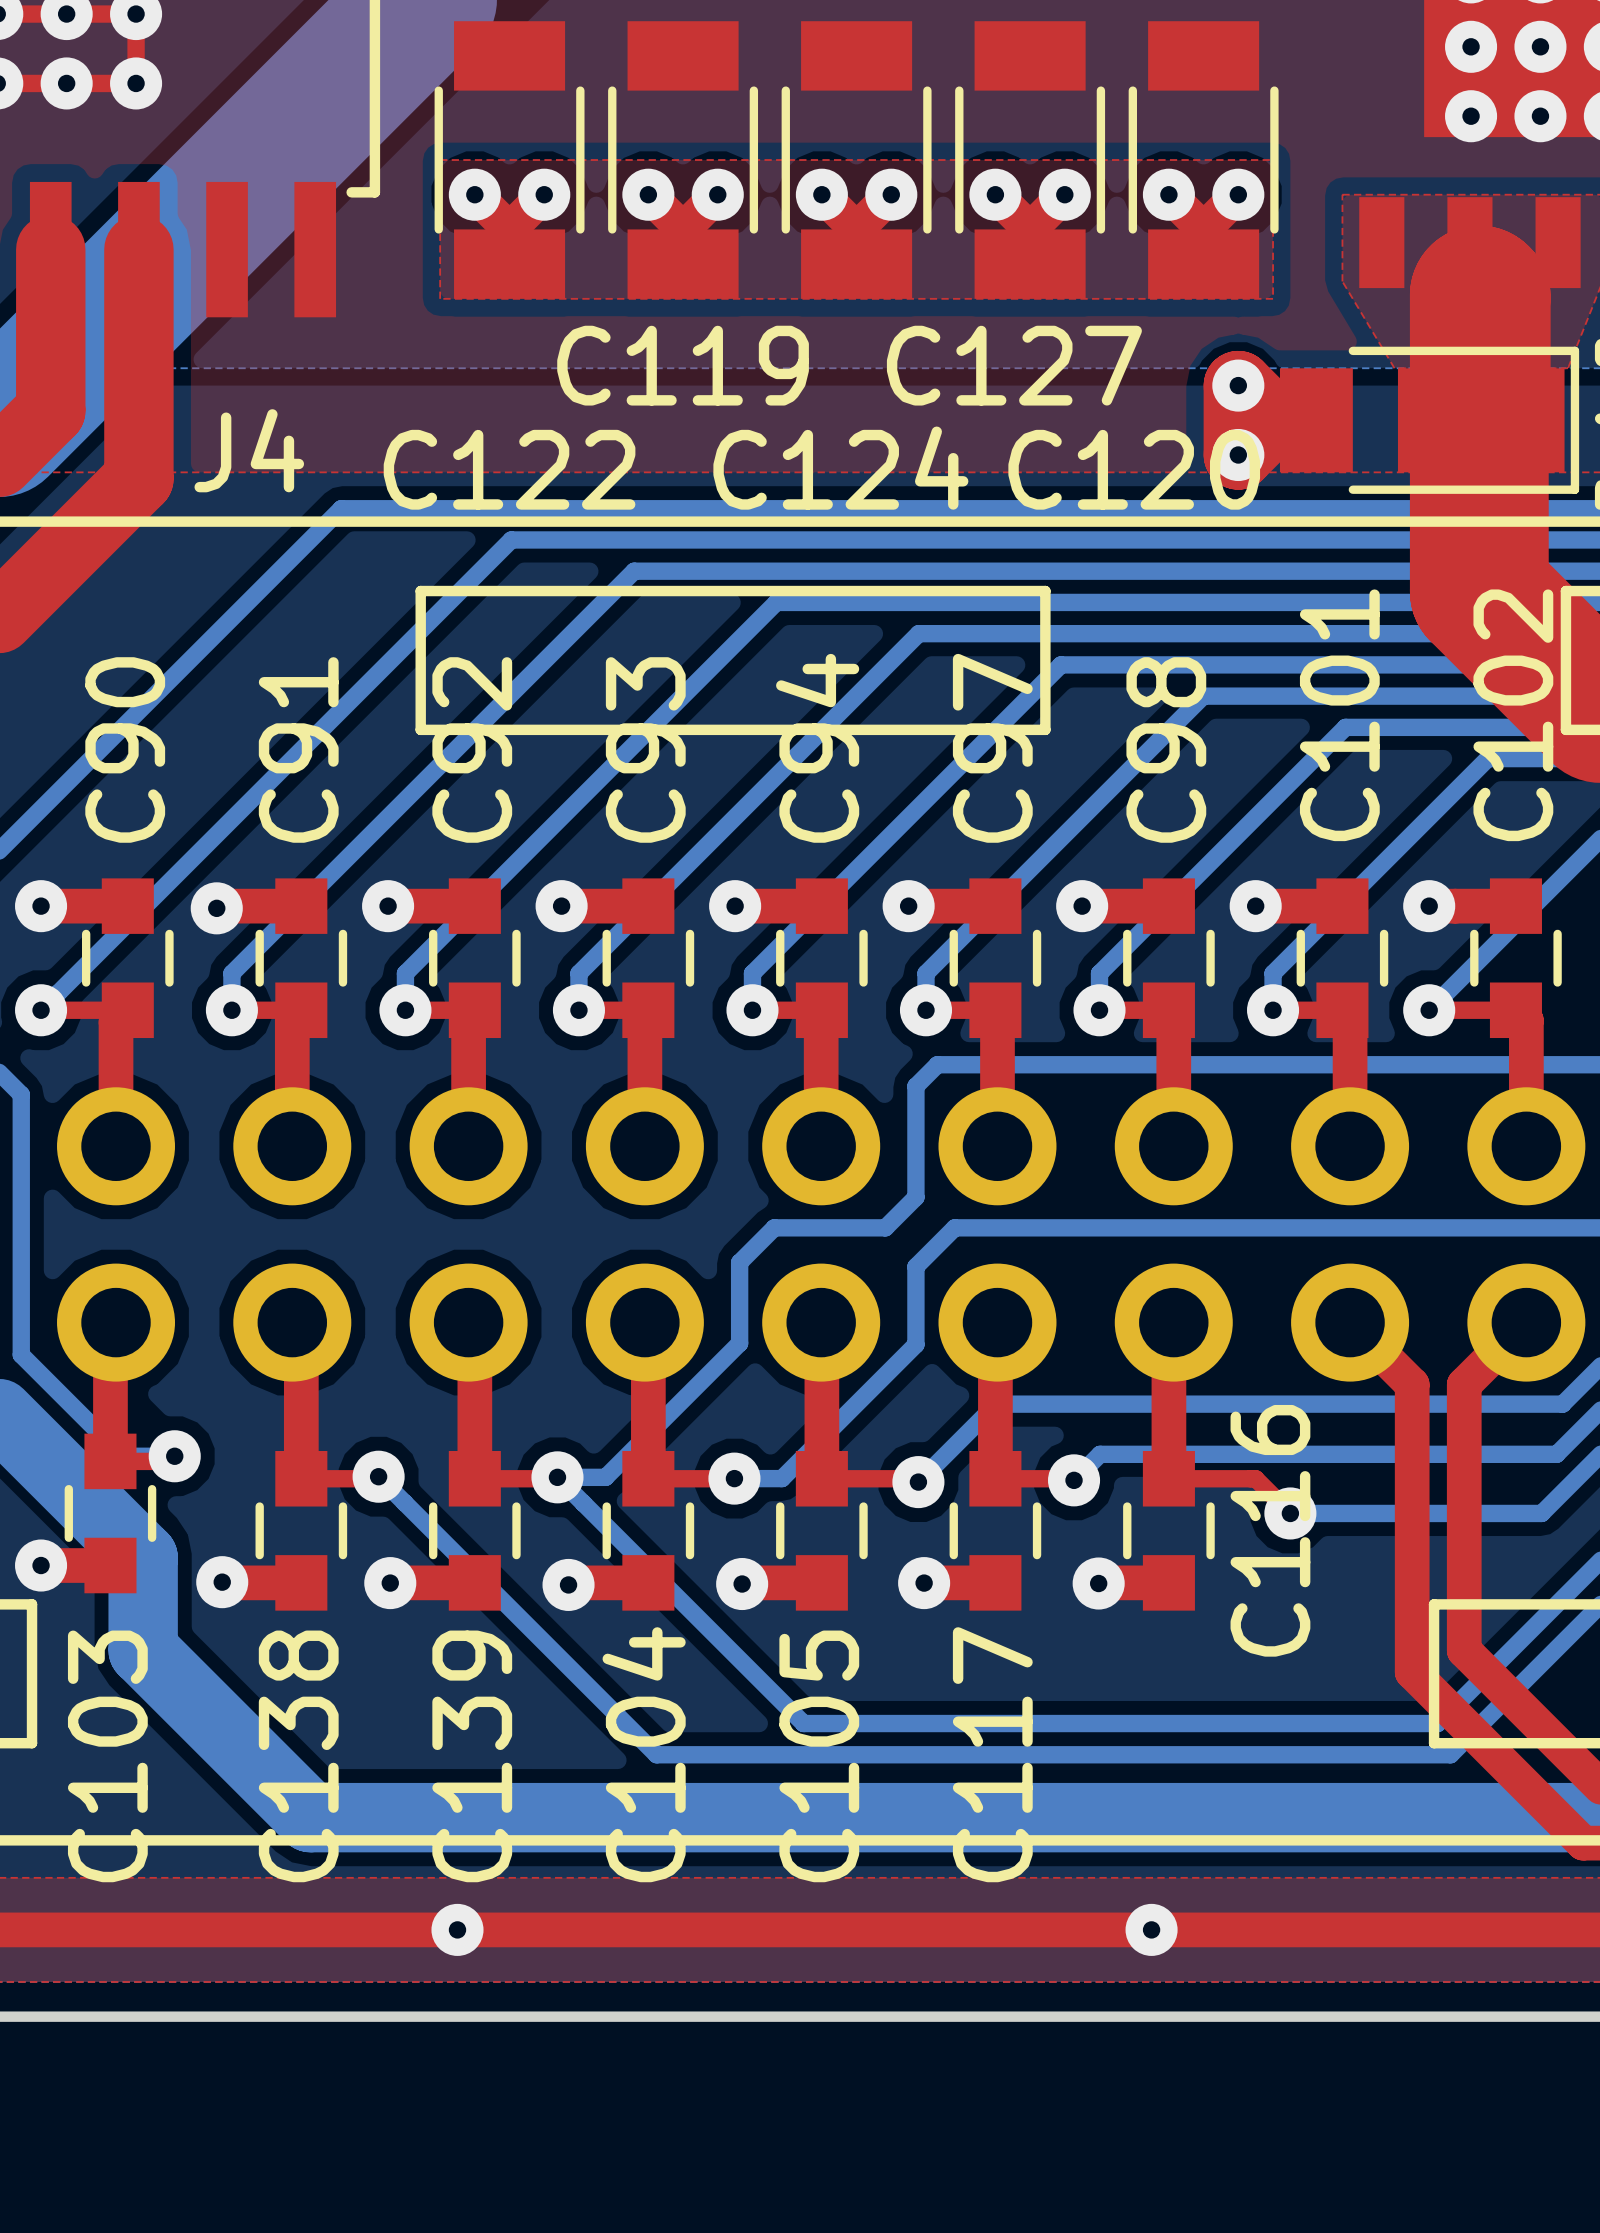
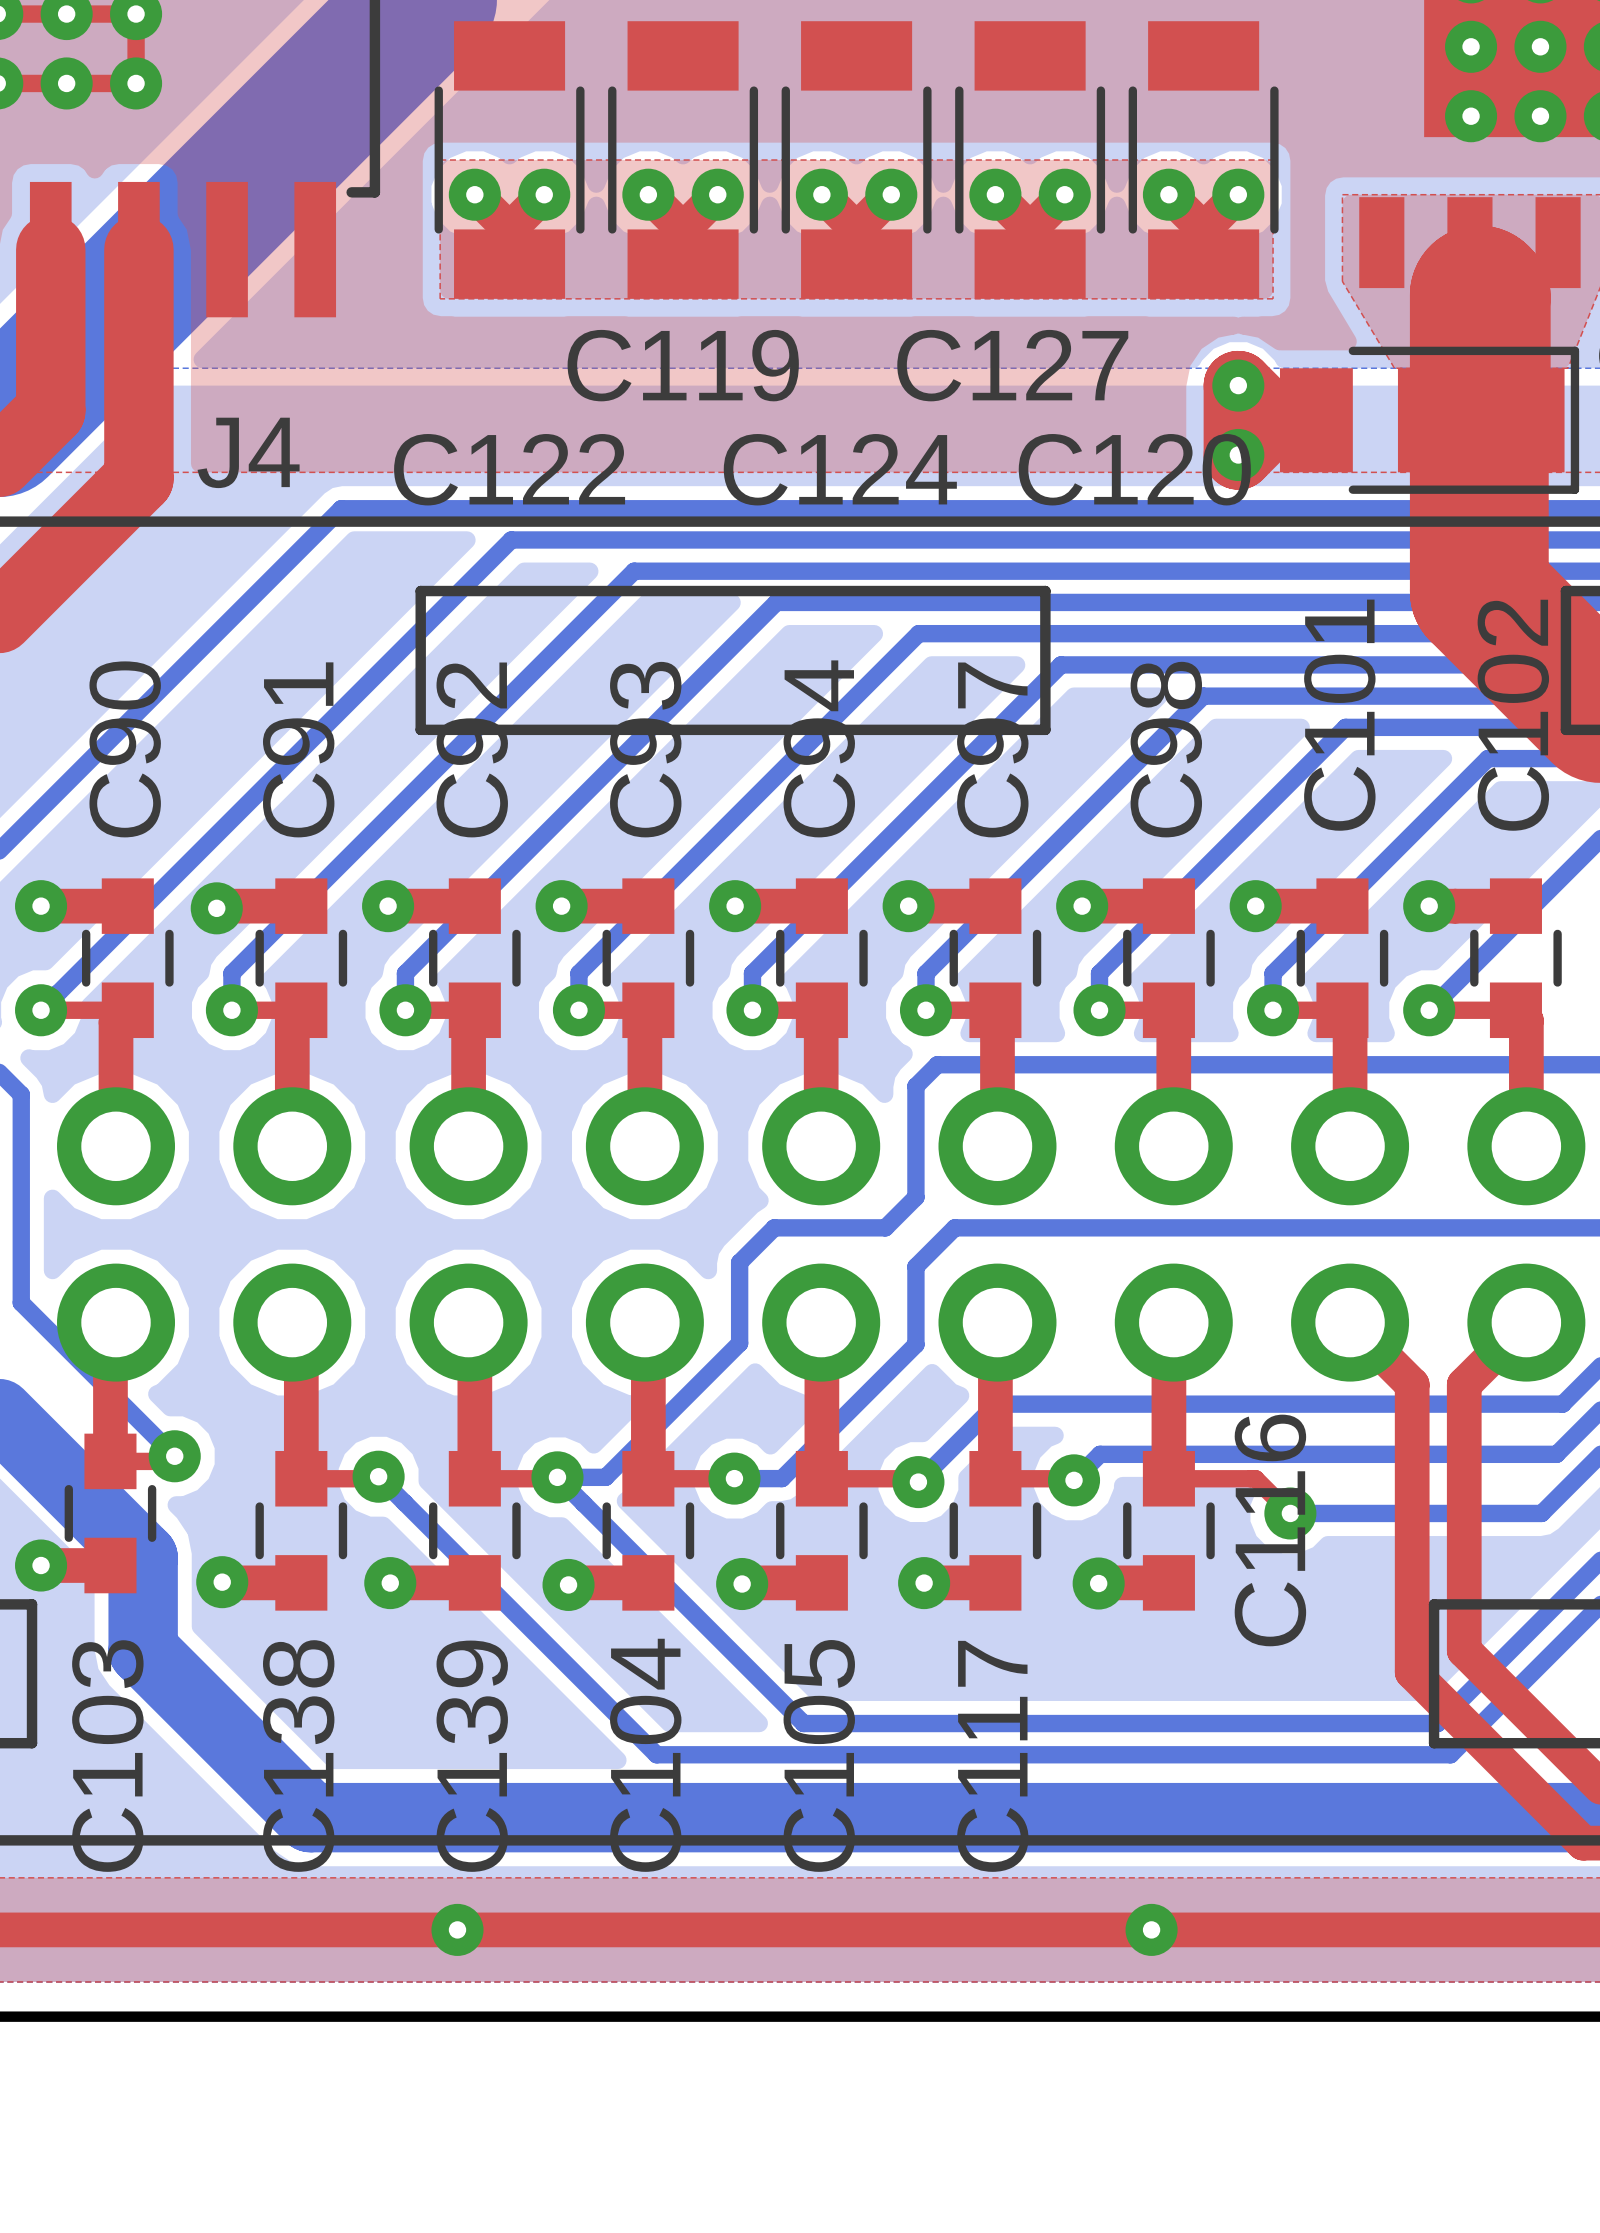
bottom track: (21, 1302) (21, 1354) (122, 1456) (174, 1456) -> (21, 1302) (174, 1456)

